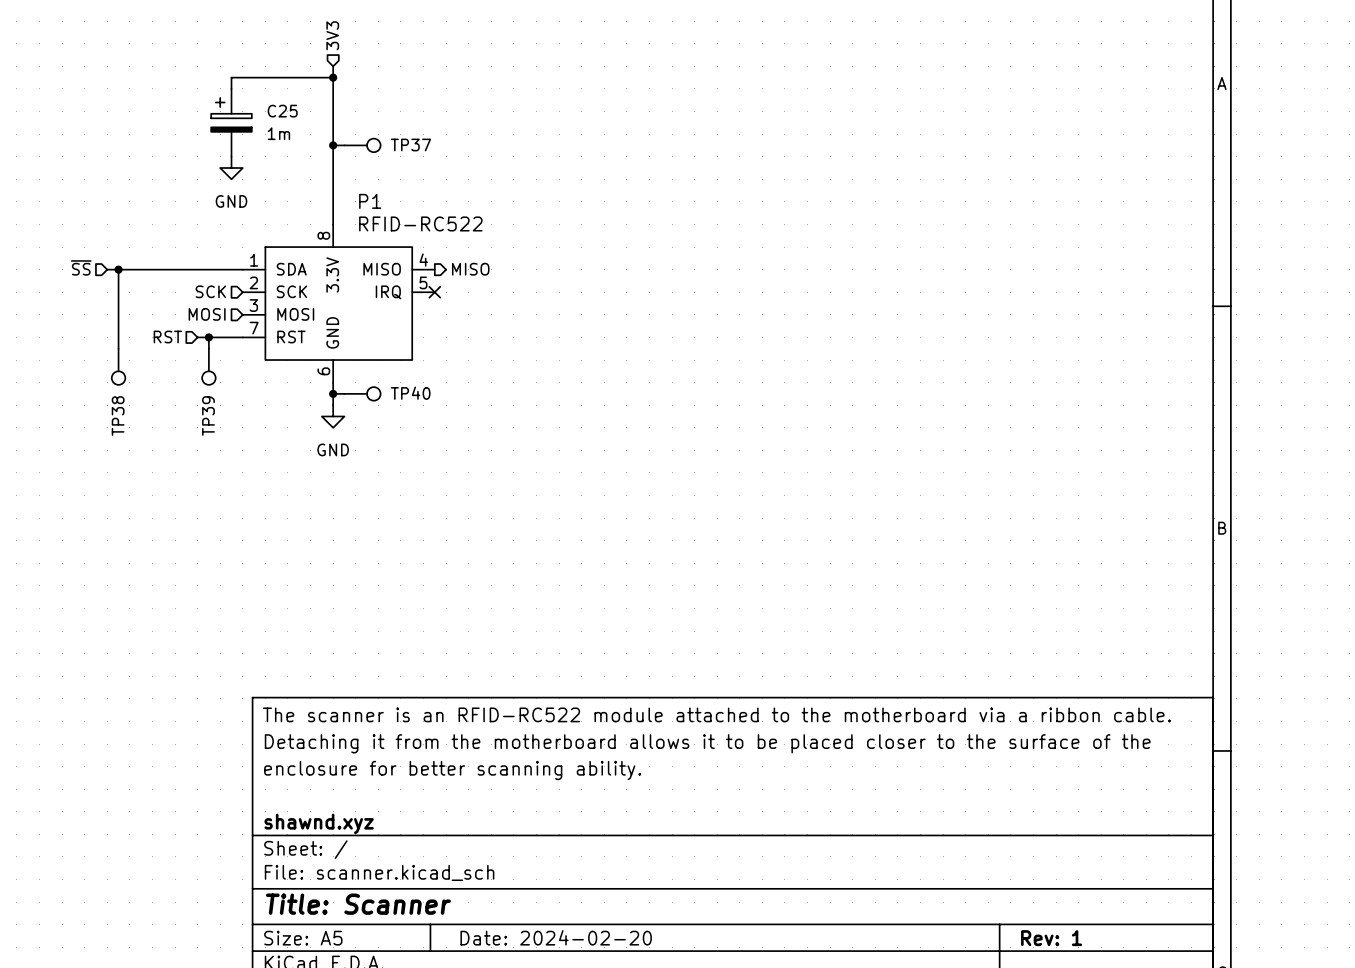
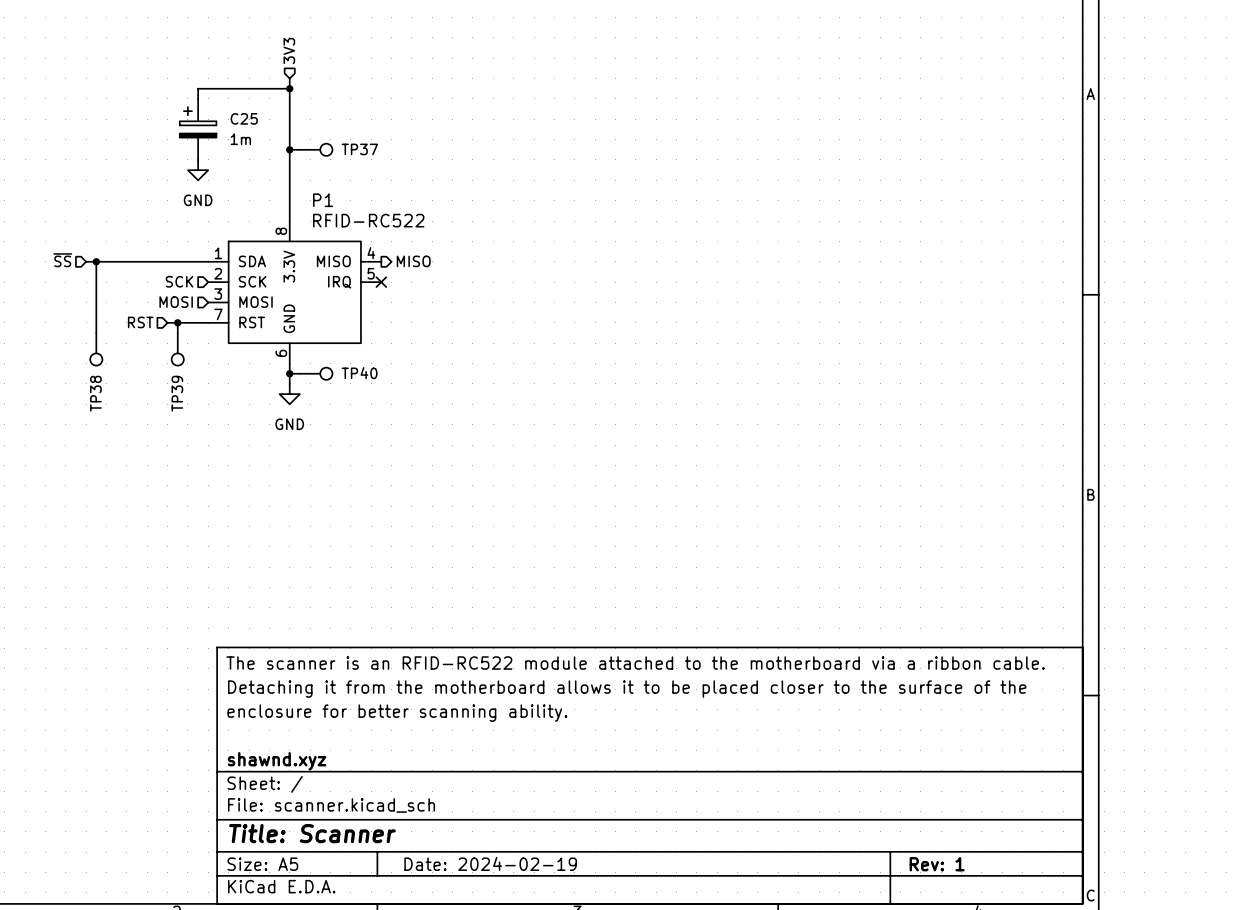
title block: Date: 2024-02-20 (556, 937) -> Date: 2024-02-19 (490, 863)

